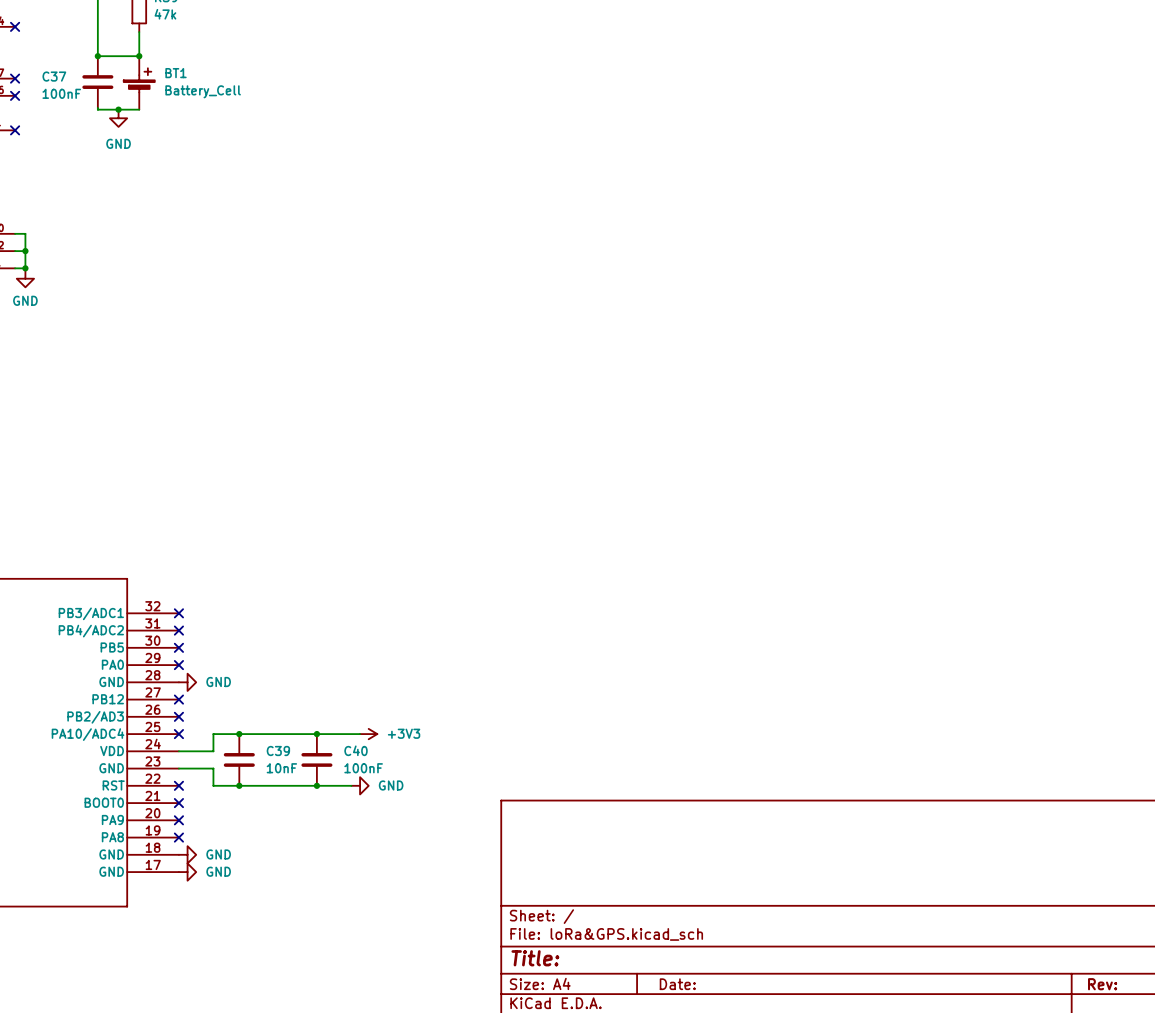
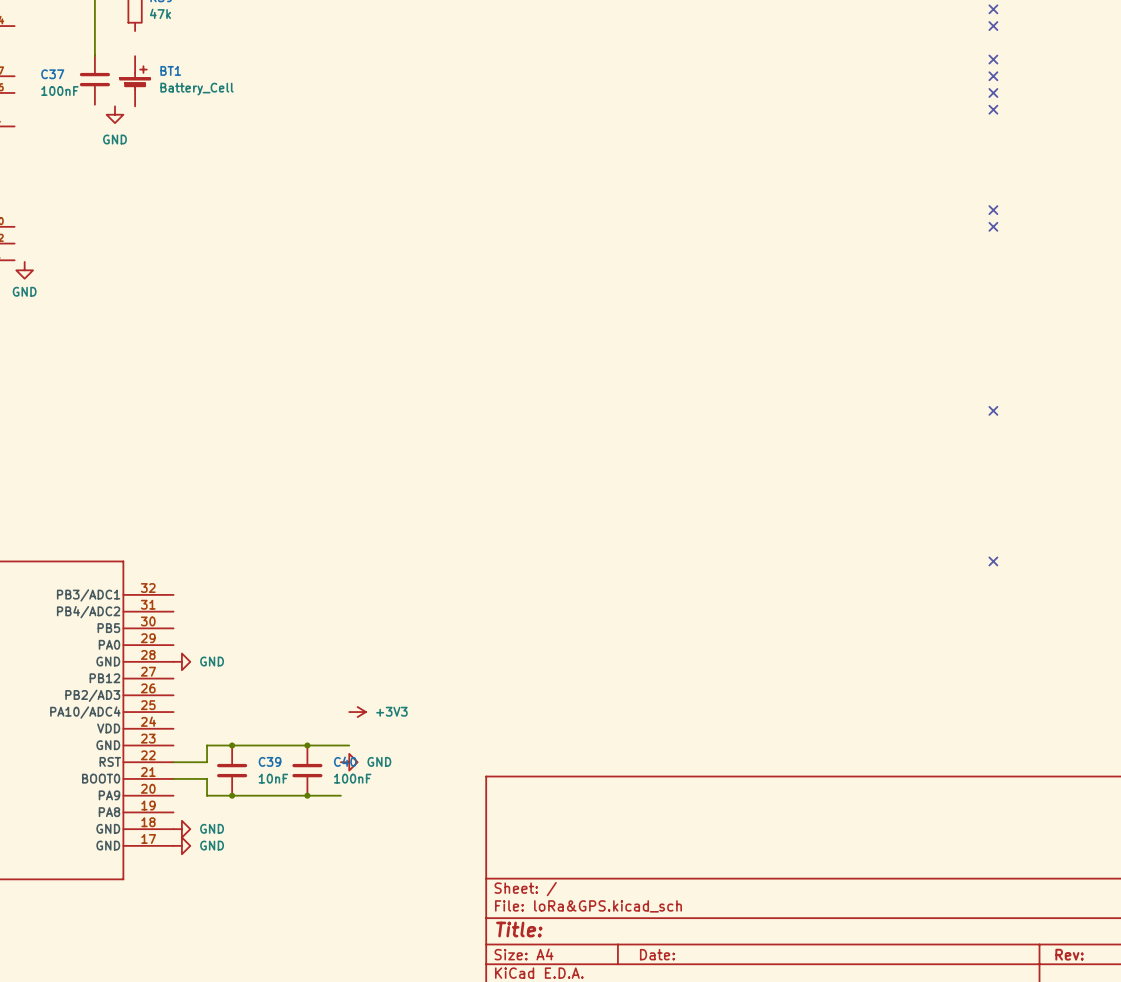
no-connect mark: none -> (993, 9)
no-connect mark: (15, 26) -> none
no-connect mark: none -> (993, 26)
wire: (139, 32) (139, 57) -> none
wire: (97, 56) (139, 56) -> none
junction: (97, 56) -> none
junction: (139, 56) -> none
no-connect mark: none -> (993, 59)
no-connect mark: (15, 78) -> none
no-connect mark: none -> (993, 76)
no-connect mark: (15, 95) -> none
no-connect mark: none -> (993, 92)
wire: (97, 107) (97, 109) (139, 109) -> none
junction: (118, 109) -> none
no-connect mark: none -> (993, 109)
no-connect mark: (15, 130) -> none
no-connect mark: none -> (993, 210)
wire: (15, 233) (25, 233) (25, 270) -> none
no-connect mark: none -> (993, 226)
wire: (15, 251) (25, 251) -> none
junction: (25, 251) -> none
wire: (15, 268) (25, 268) -> none
junction: (25, 268) -> none
no-connect mark: none -> (993, 410)
no-connect mark: none -> (993, 561)
no-connect mark: (178, 613) -> none
no-connect mark: (178, 630) -> none
no-connect mark: (178, 647) -> none
no-connect mark: (178, 665) -> none
no-connect mark: (178, 699) -> none
no-connect mark: (178, 716) -> none
no-connect mark: (178, 734) -> none
junction: (239, 734) -> none
junction: (316, 734) -> none
wire: (360, 734) (213, 734) (213, 751) (178, 751) -> none
C39 position: (239, 759) -> (232, 770)
C40 position: (316, 759) -> (307, 770)
wire: (178, 768) (213, 768) -> (349, 745) (207, 745)
junction: none -> (232, 745)
junction: none -> (307, 745)
no-connect mark: (178, 785) -> none
wire: (213, 785) (351, 785) -> (207, 762) (173, 762)
junction: (239, 785) -> none
junction: (316, 785) -> none
wire: none -> (173, 778) (207, 778) (207, 795) (340, 795)
no-connect mark: (178, 803) -> none
no-connect mark: (178, 820) -> none
junction: none -> (232, 795)
junction: none -> (307, 795)
no-connect mark: (178, 837) -> none

